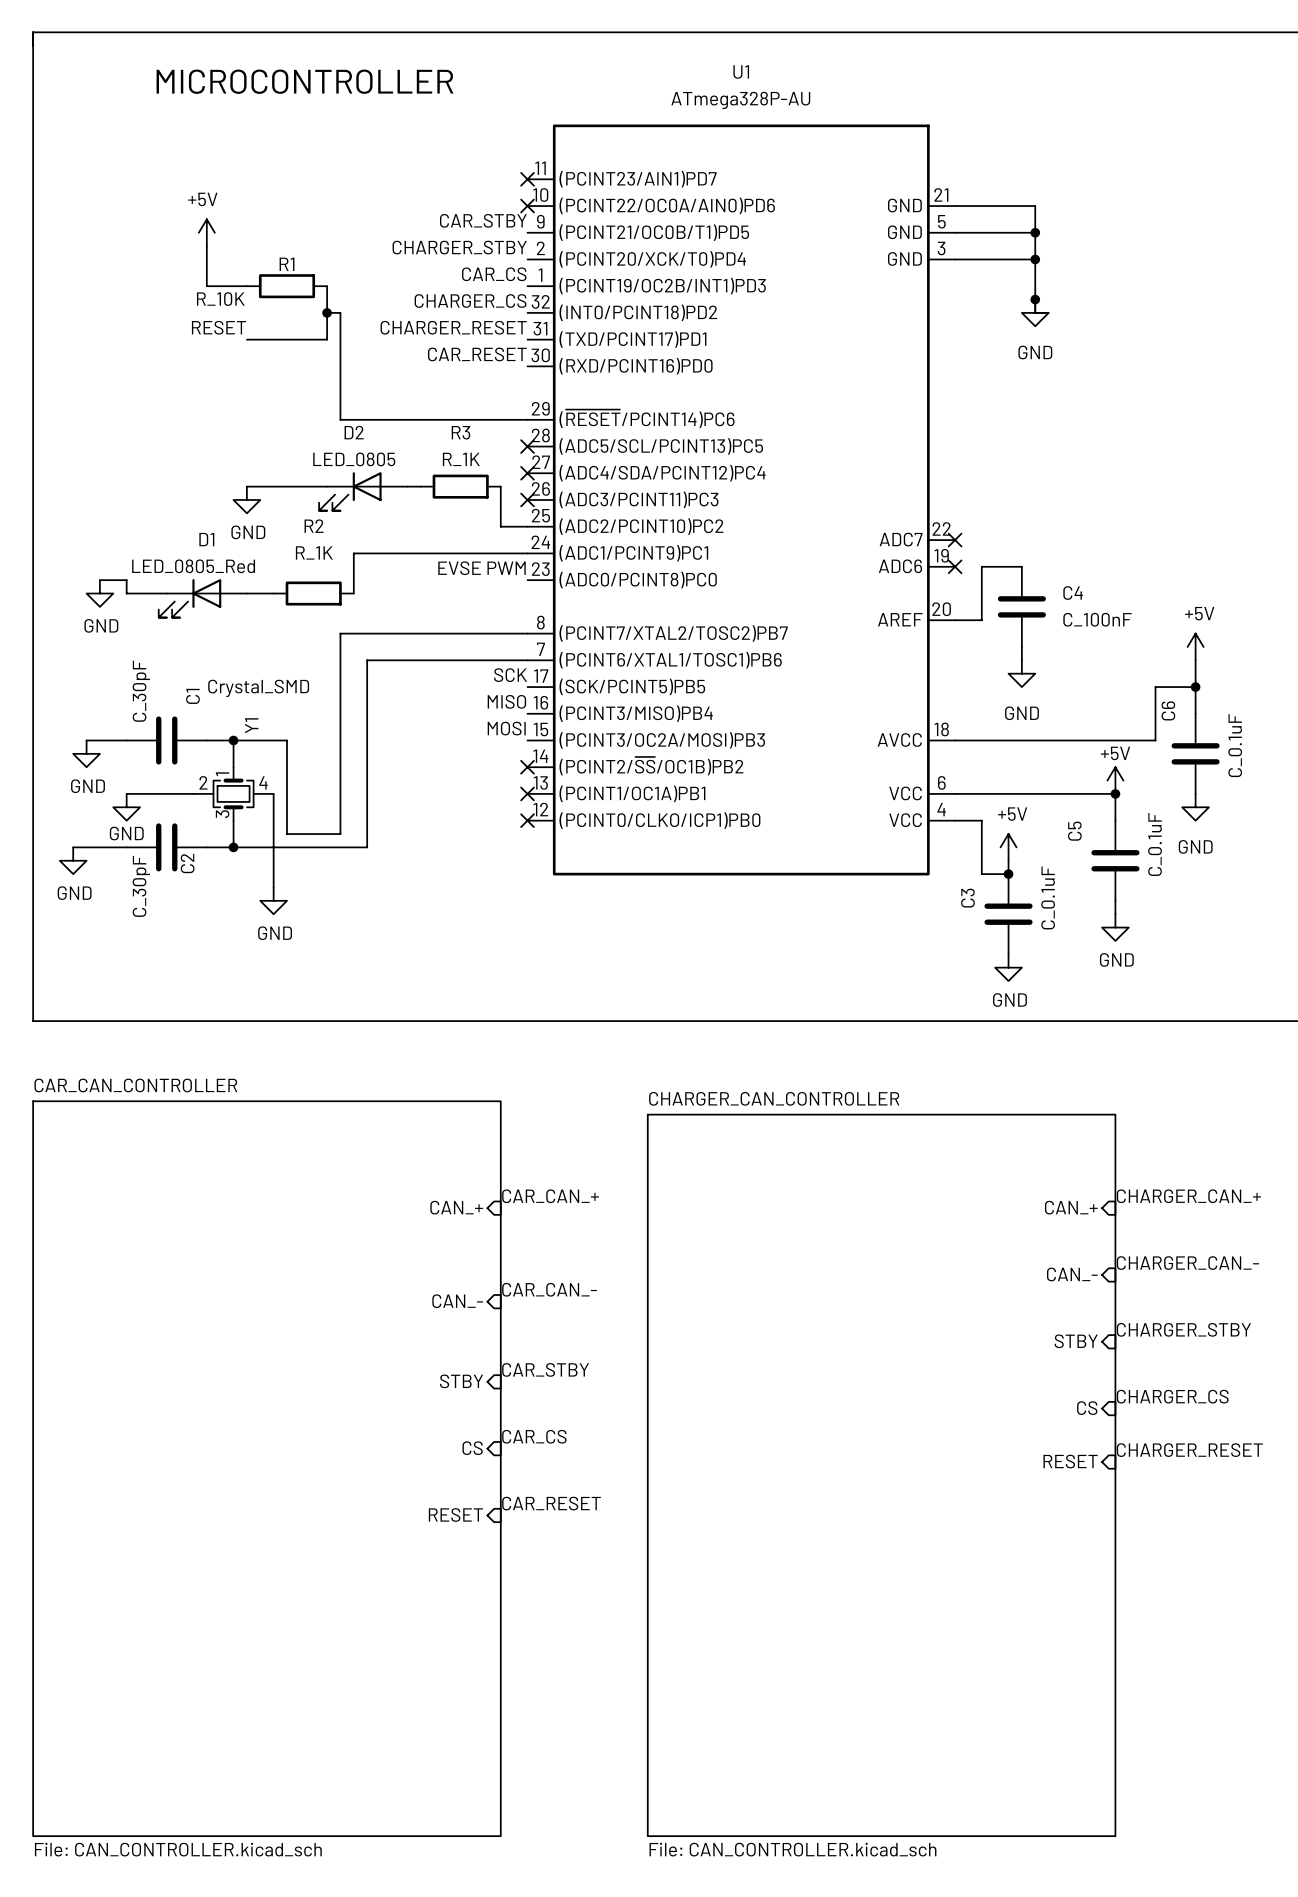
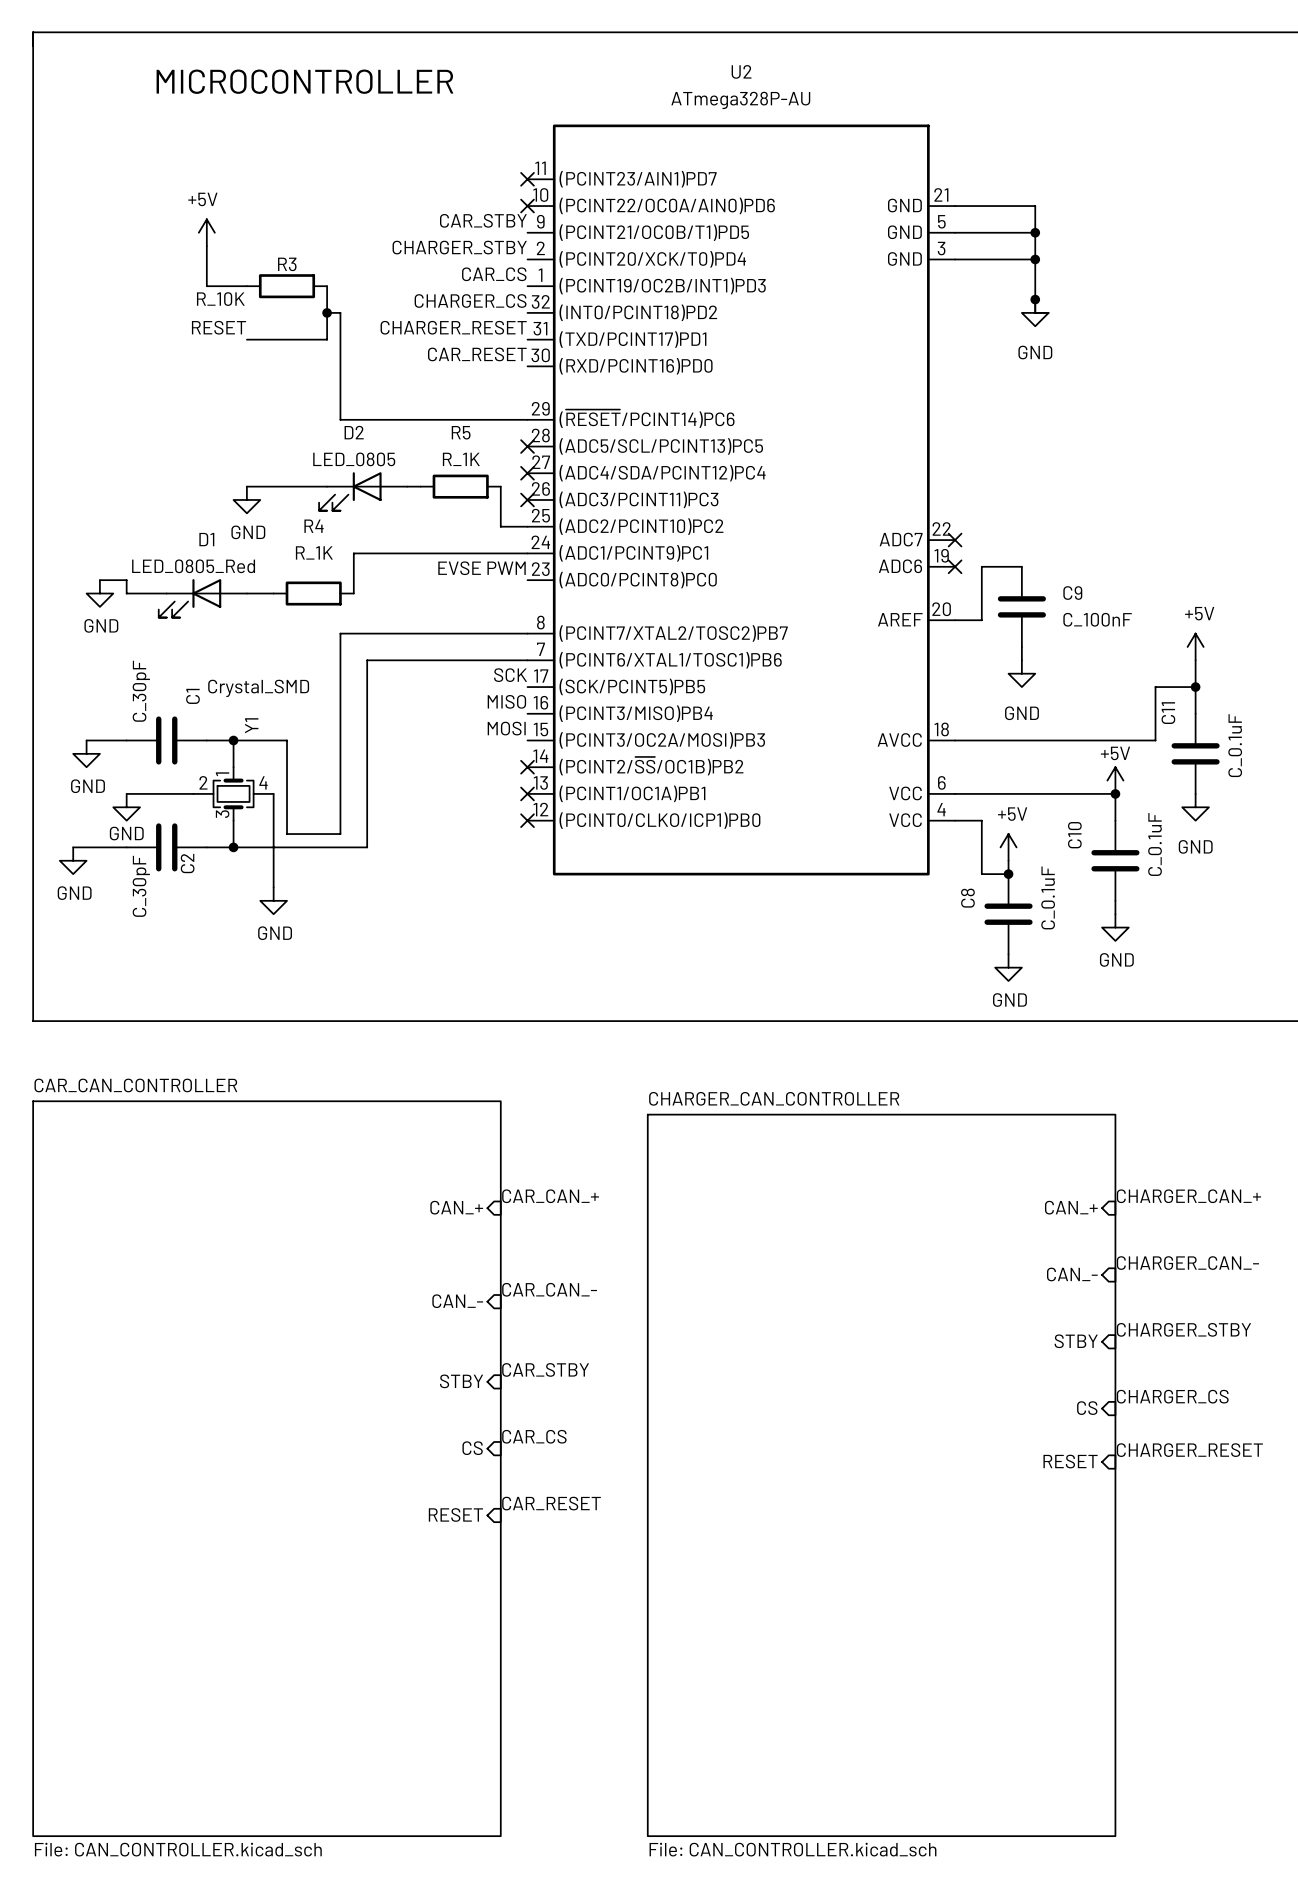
U1 name: U1 (741, 71) -> U2 (741, 71)
R1 name: R1 (287, 264) -> R3 (287, 264)
R3 name: R3 (460, 432) -> R5 (461, 432)
R2 name: R2 (314, 526) -> R4 (314, 526)
C4 name: C4 (1073, 593) -> C9 (1072, 593)
C6 name: C6 (1168, 710) -> C11 (1168, 713)
C5 name: C5 (1074, 831) -> C10 (1074, 835)
C3 name: C3 (967, 898) -> C8 (967, 898)

